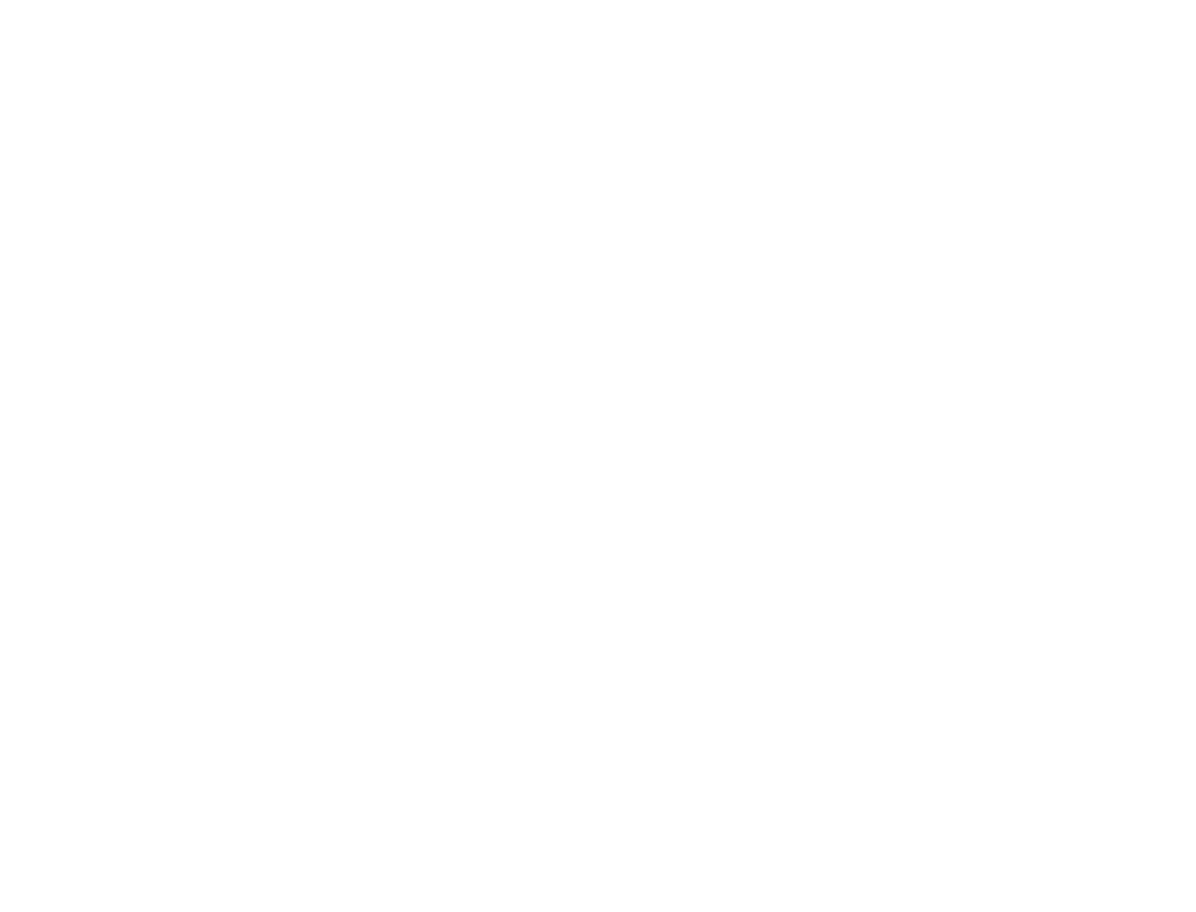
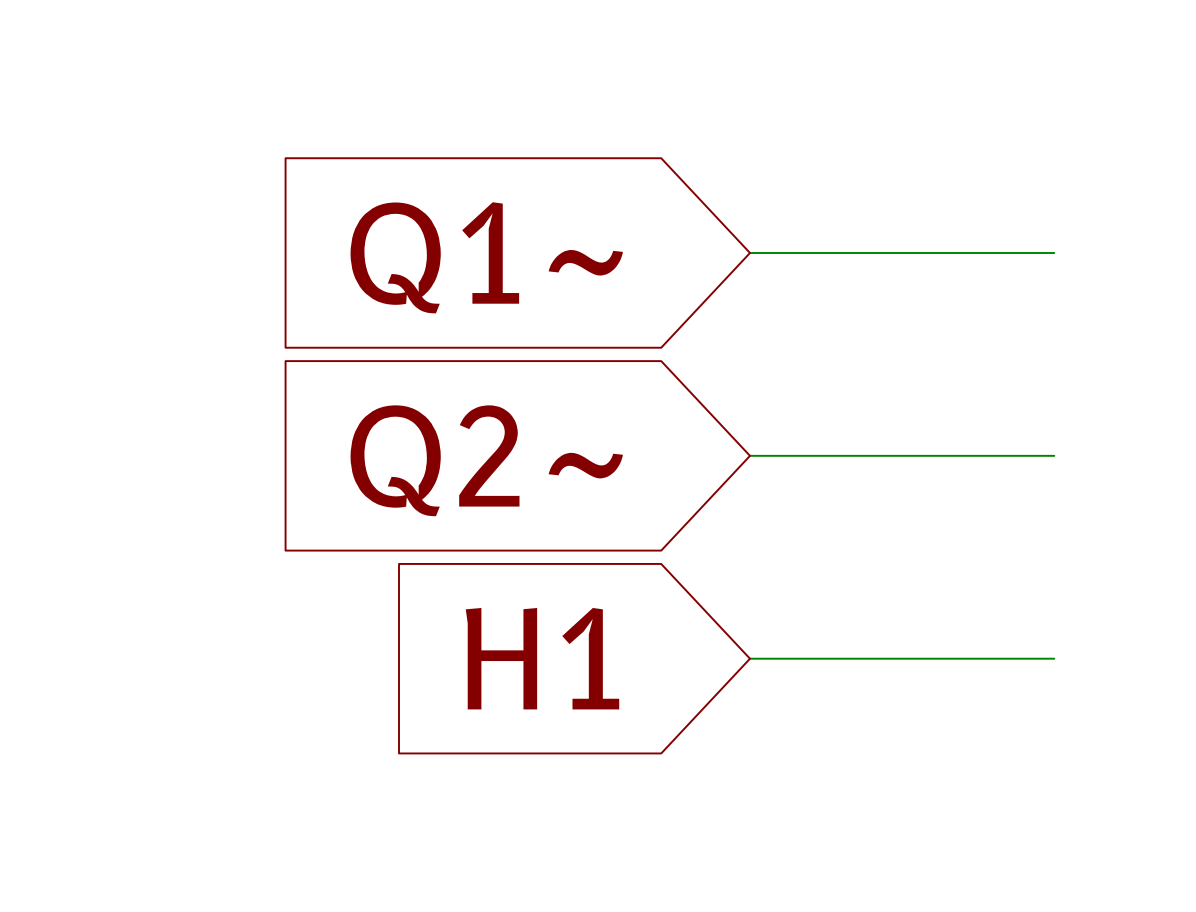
wire: none -> (749, 252) (1054, 252)
global label: none -> Q1~ (486, 257)
wire: none -> (749, 455) (1054, 455)
global label: none -> Q2~ (486, 460)
global label: none -> H1 (542, 658)
wire: none -> (749, 658) (1054, 658)

